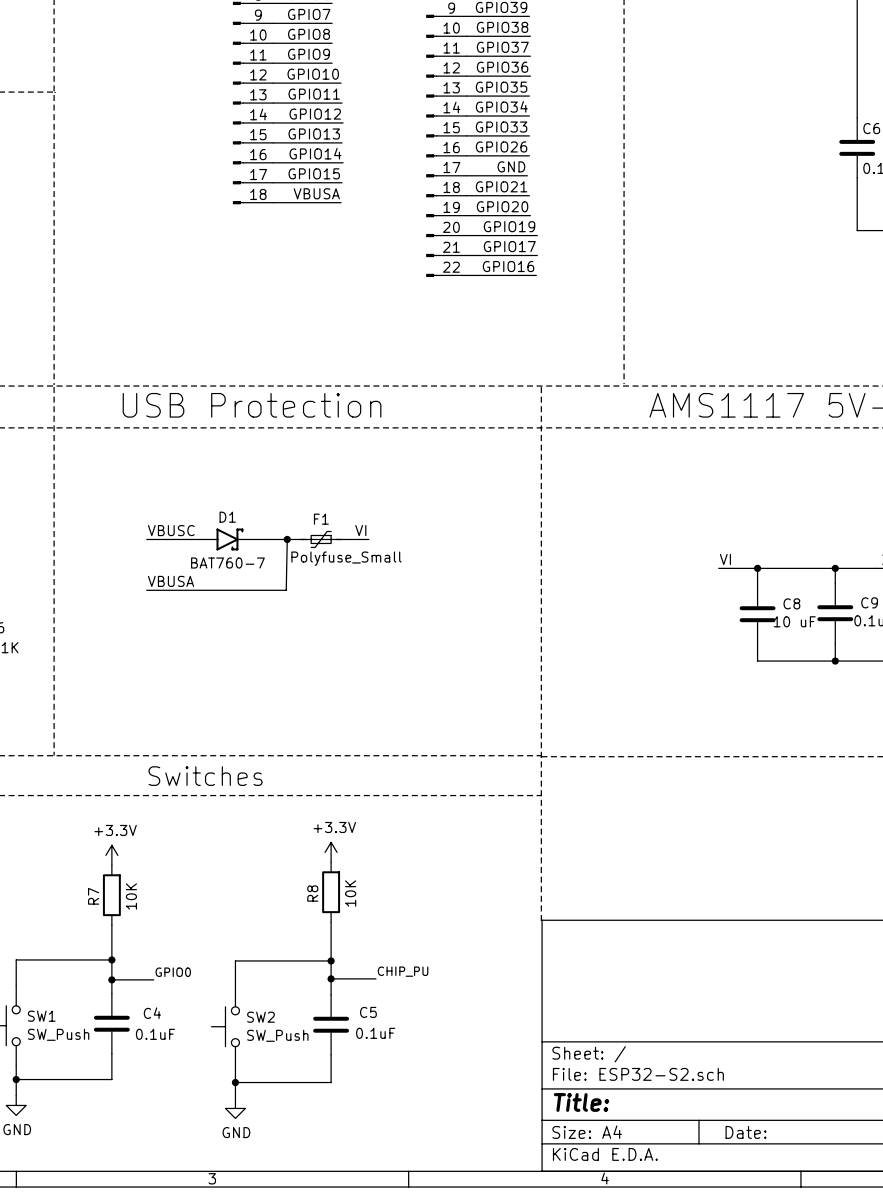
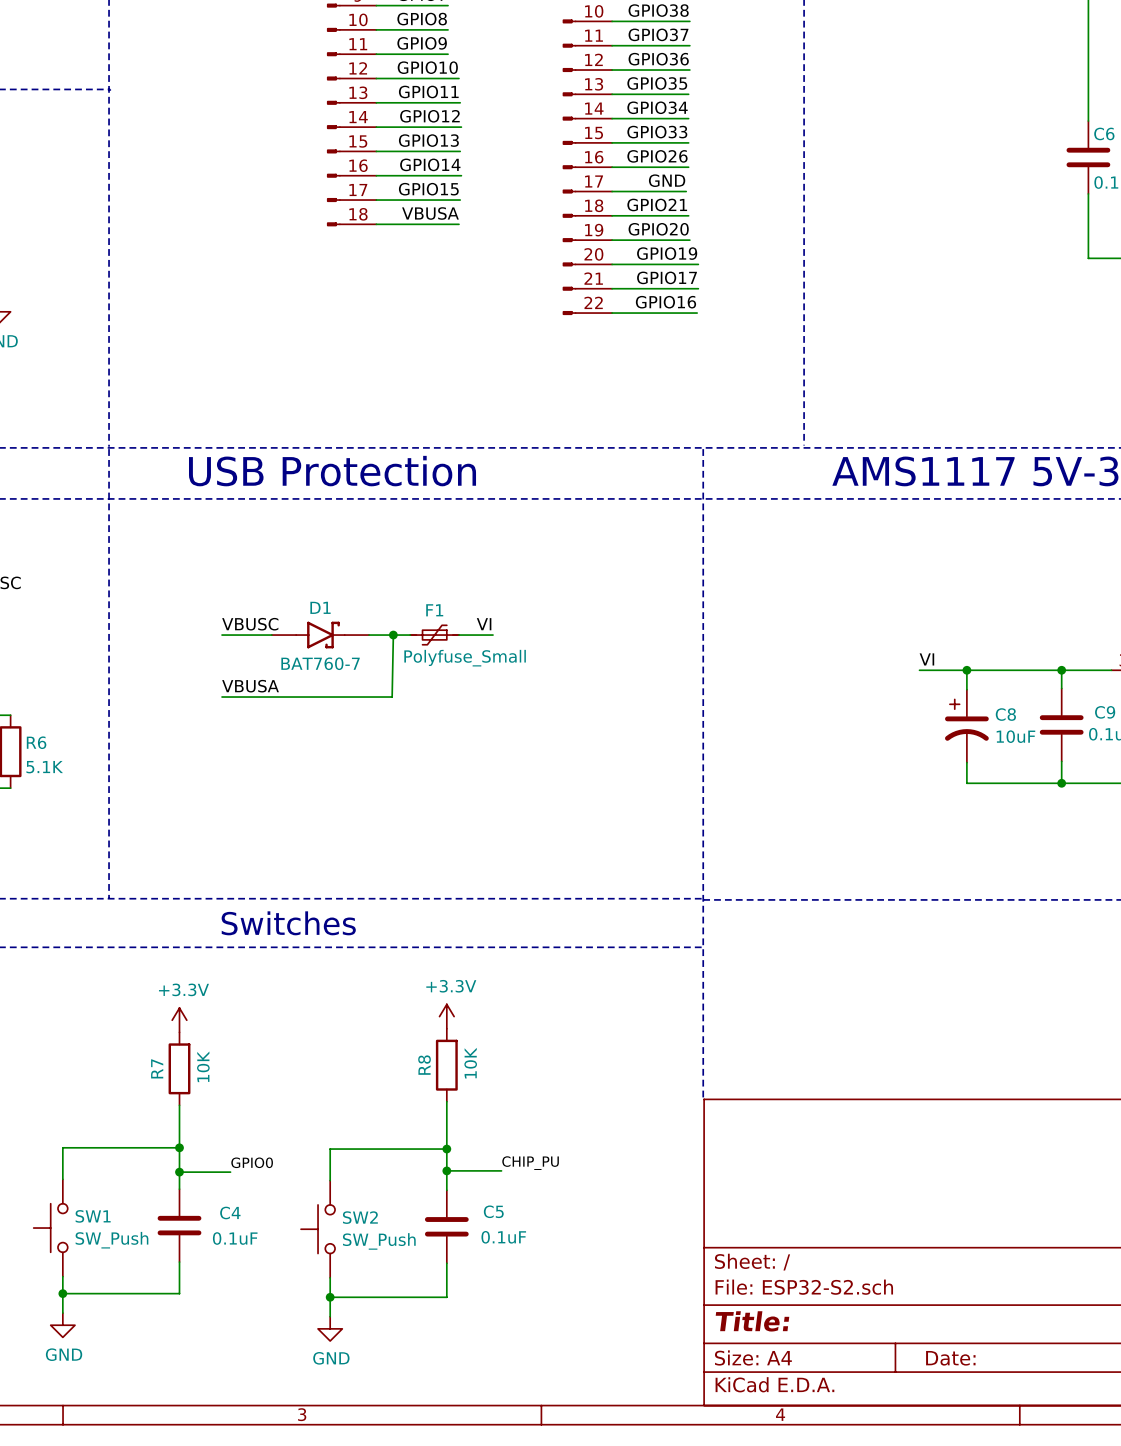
C8 symbol: [739, 584, 776, 645] -> [945, 689, 989, 763]
C8 value: 10 uF (794, 621) -> 10uF (1015, 736)

